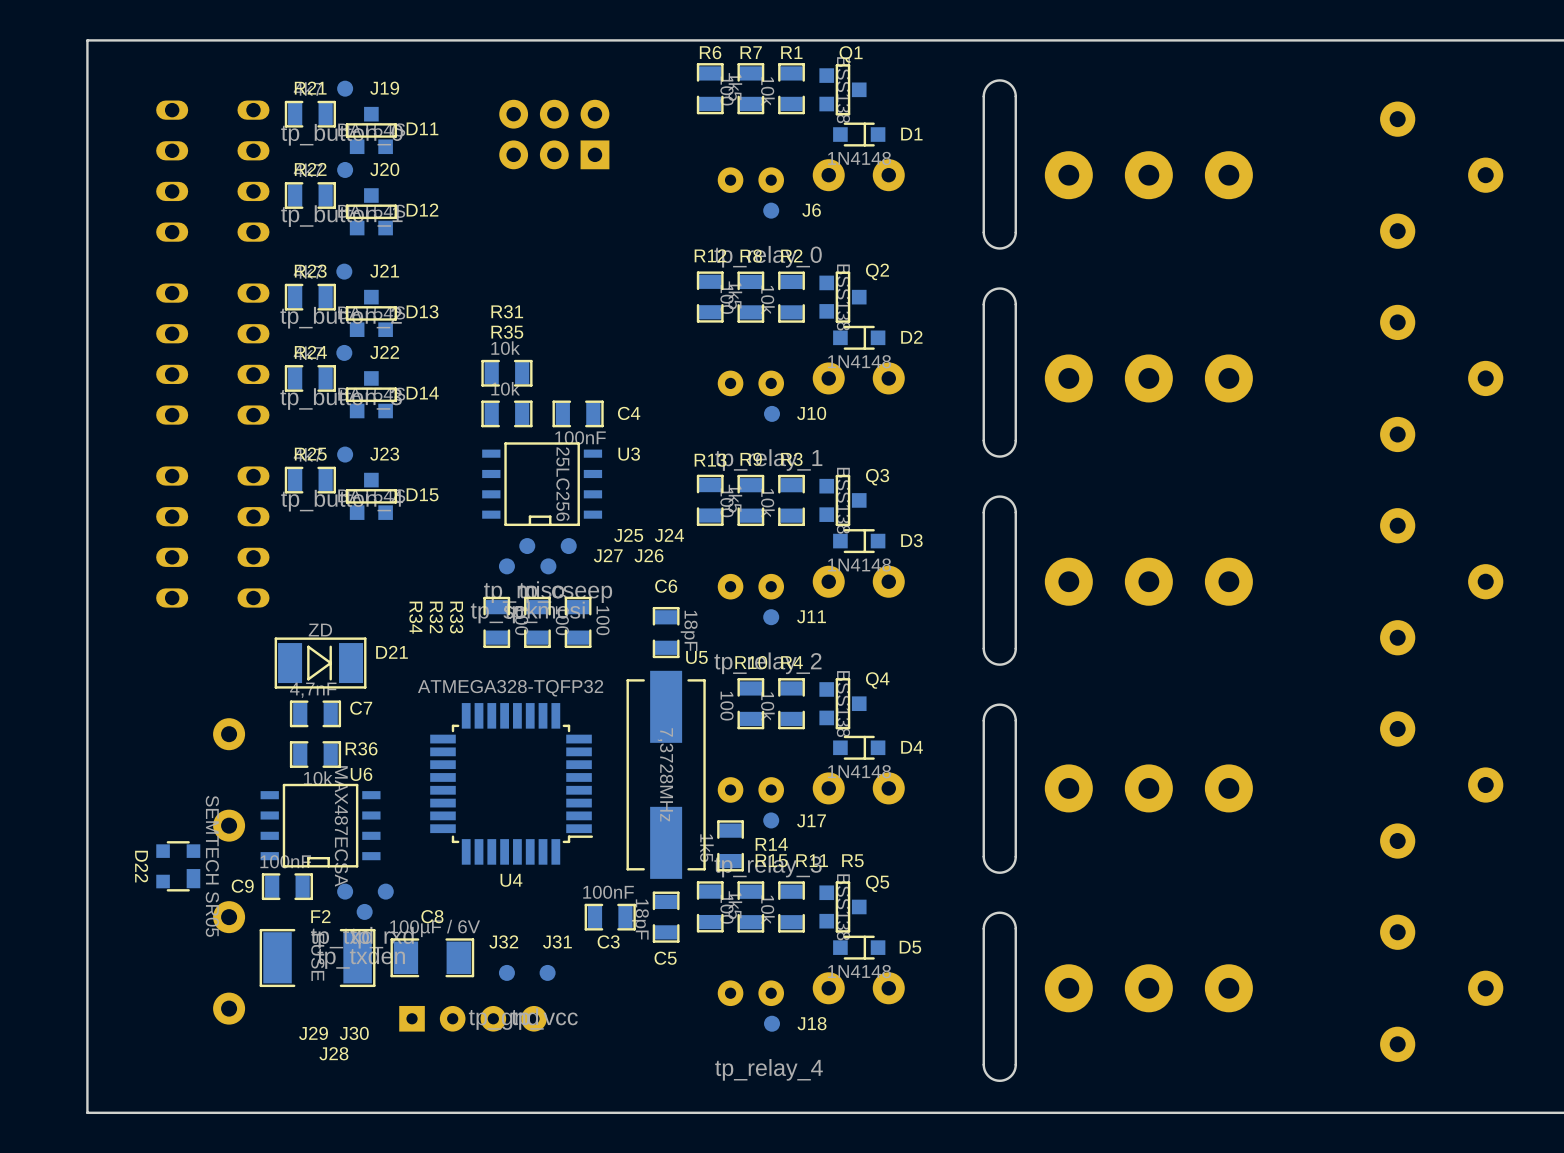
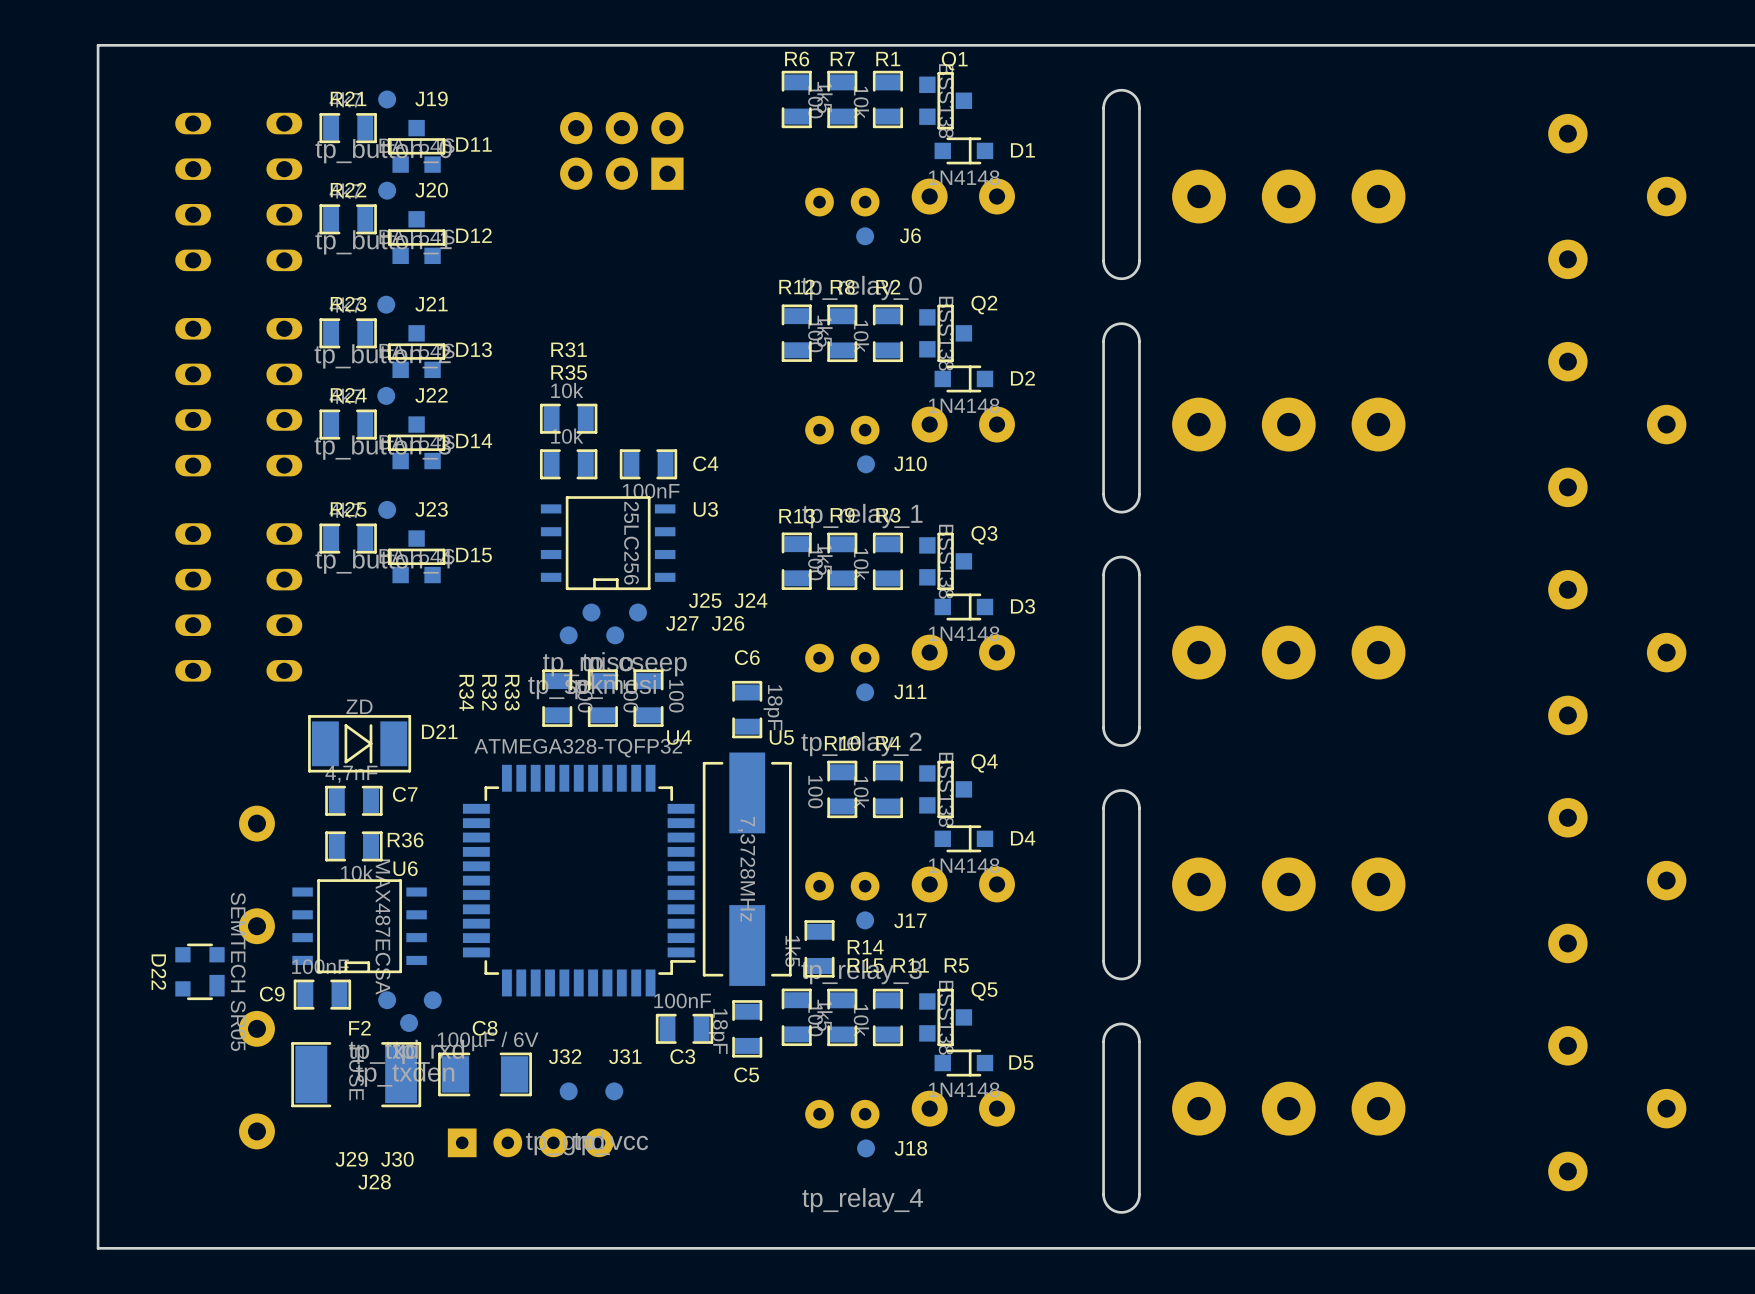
U4 footprint: [430, 703, 594, 865] -> [462, 764, 696, 997]
U4 name position: U4 (511, 880) -> U4 (679, 737)

